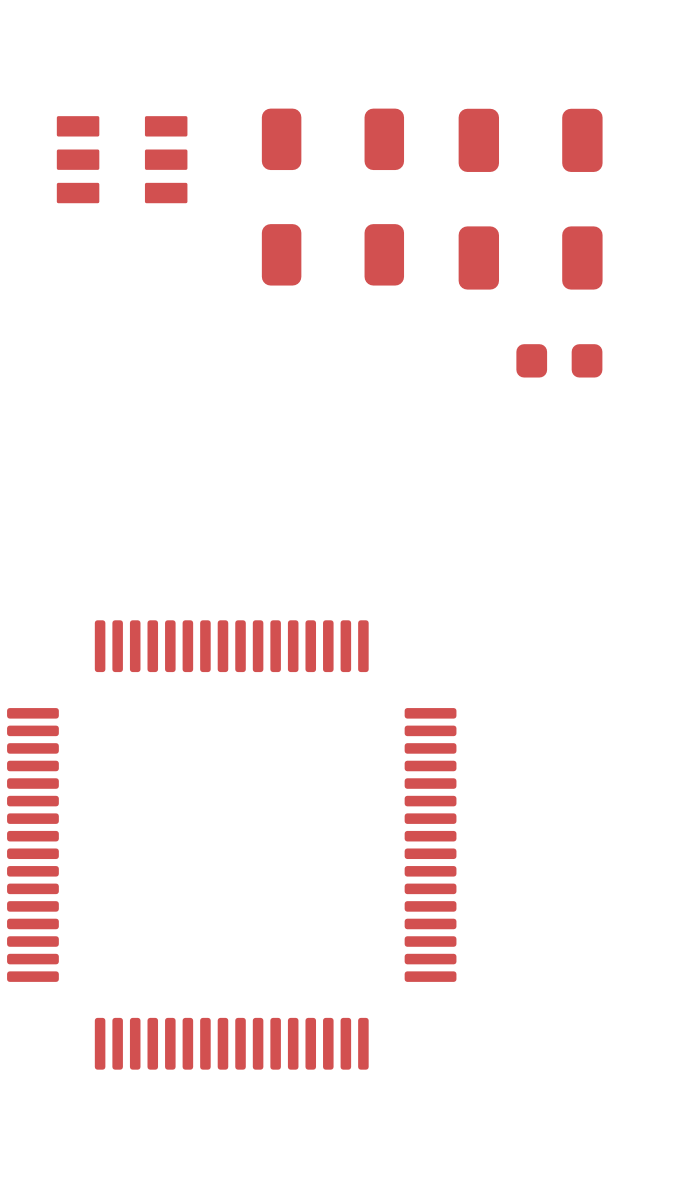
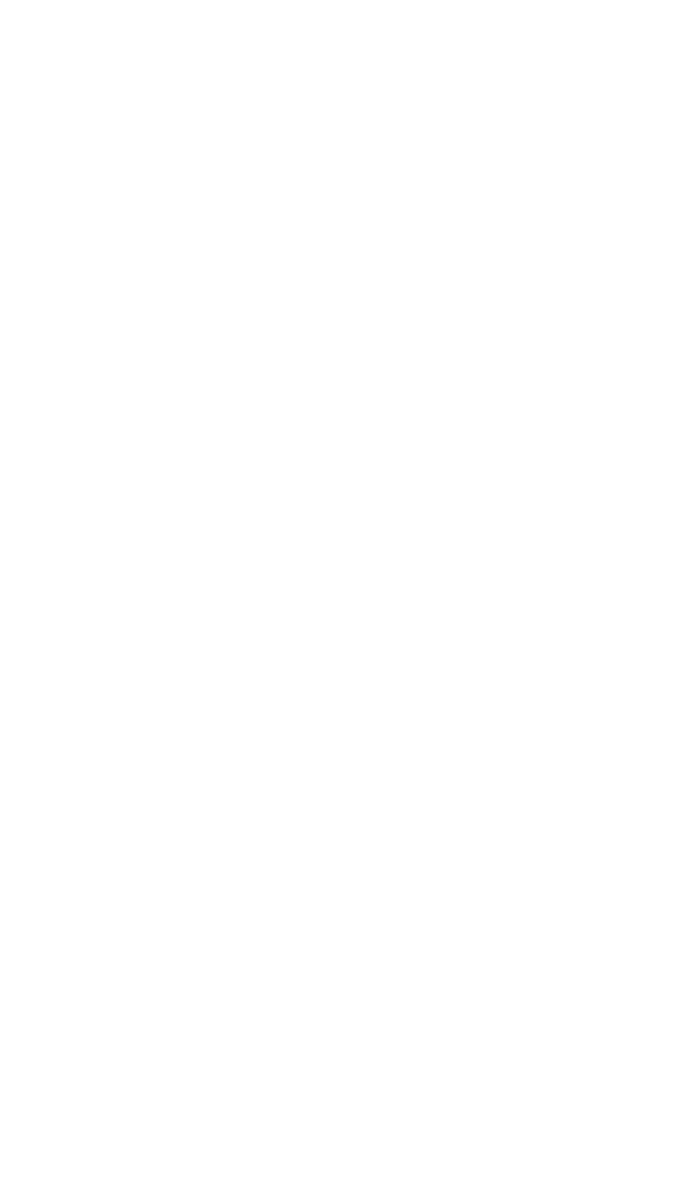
part: (332, 139) -> none
part: (530, 140) -> none
part: (122, 159) -> none
part: (332, 254) -> none
part: (530, 257) -> none
part: (559, 360) -> none
part: (231, 844) -> none

